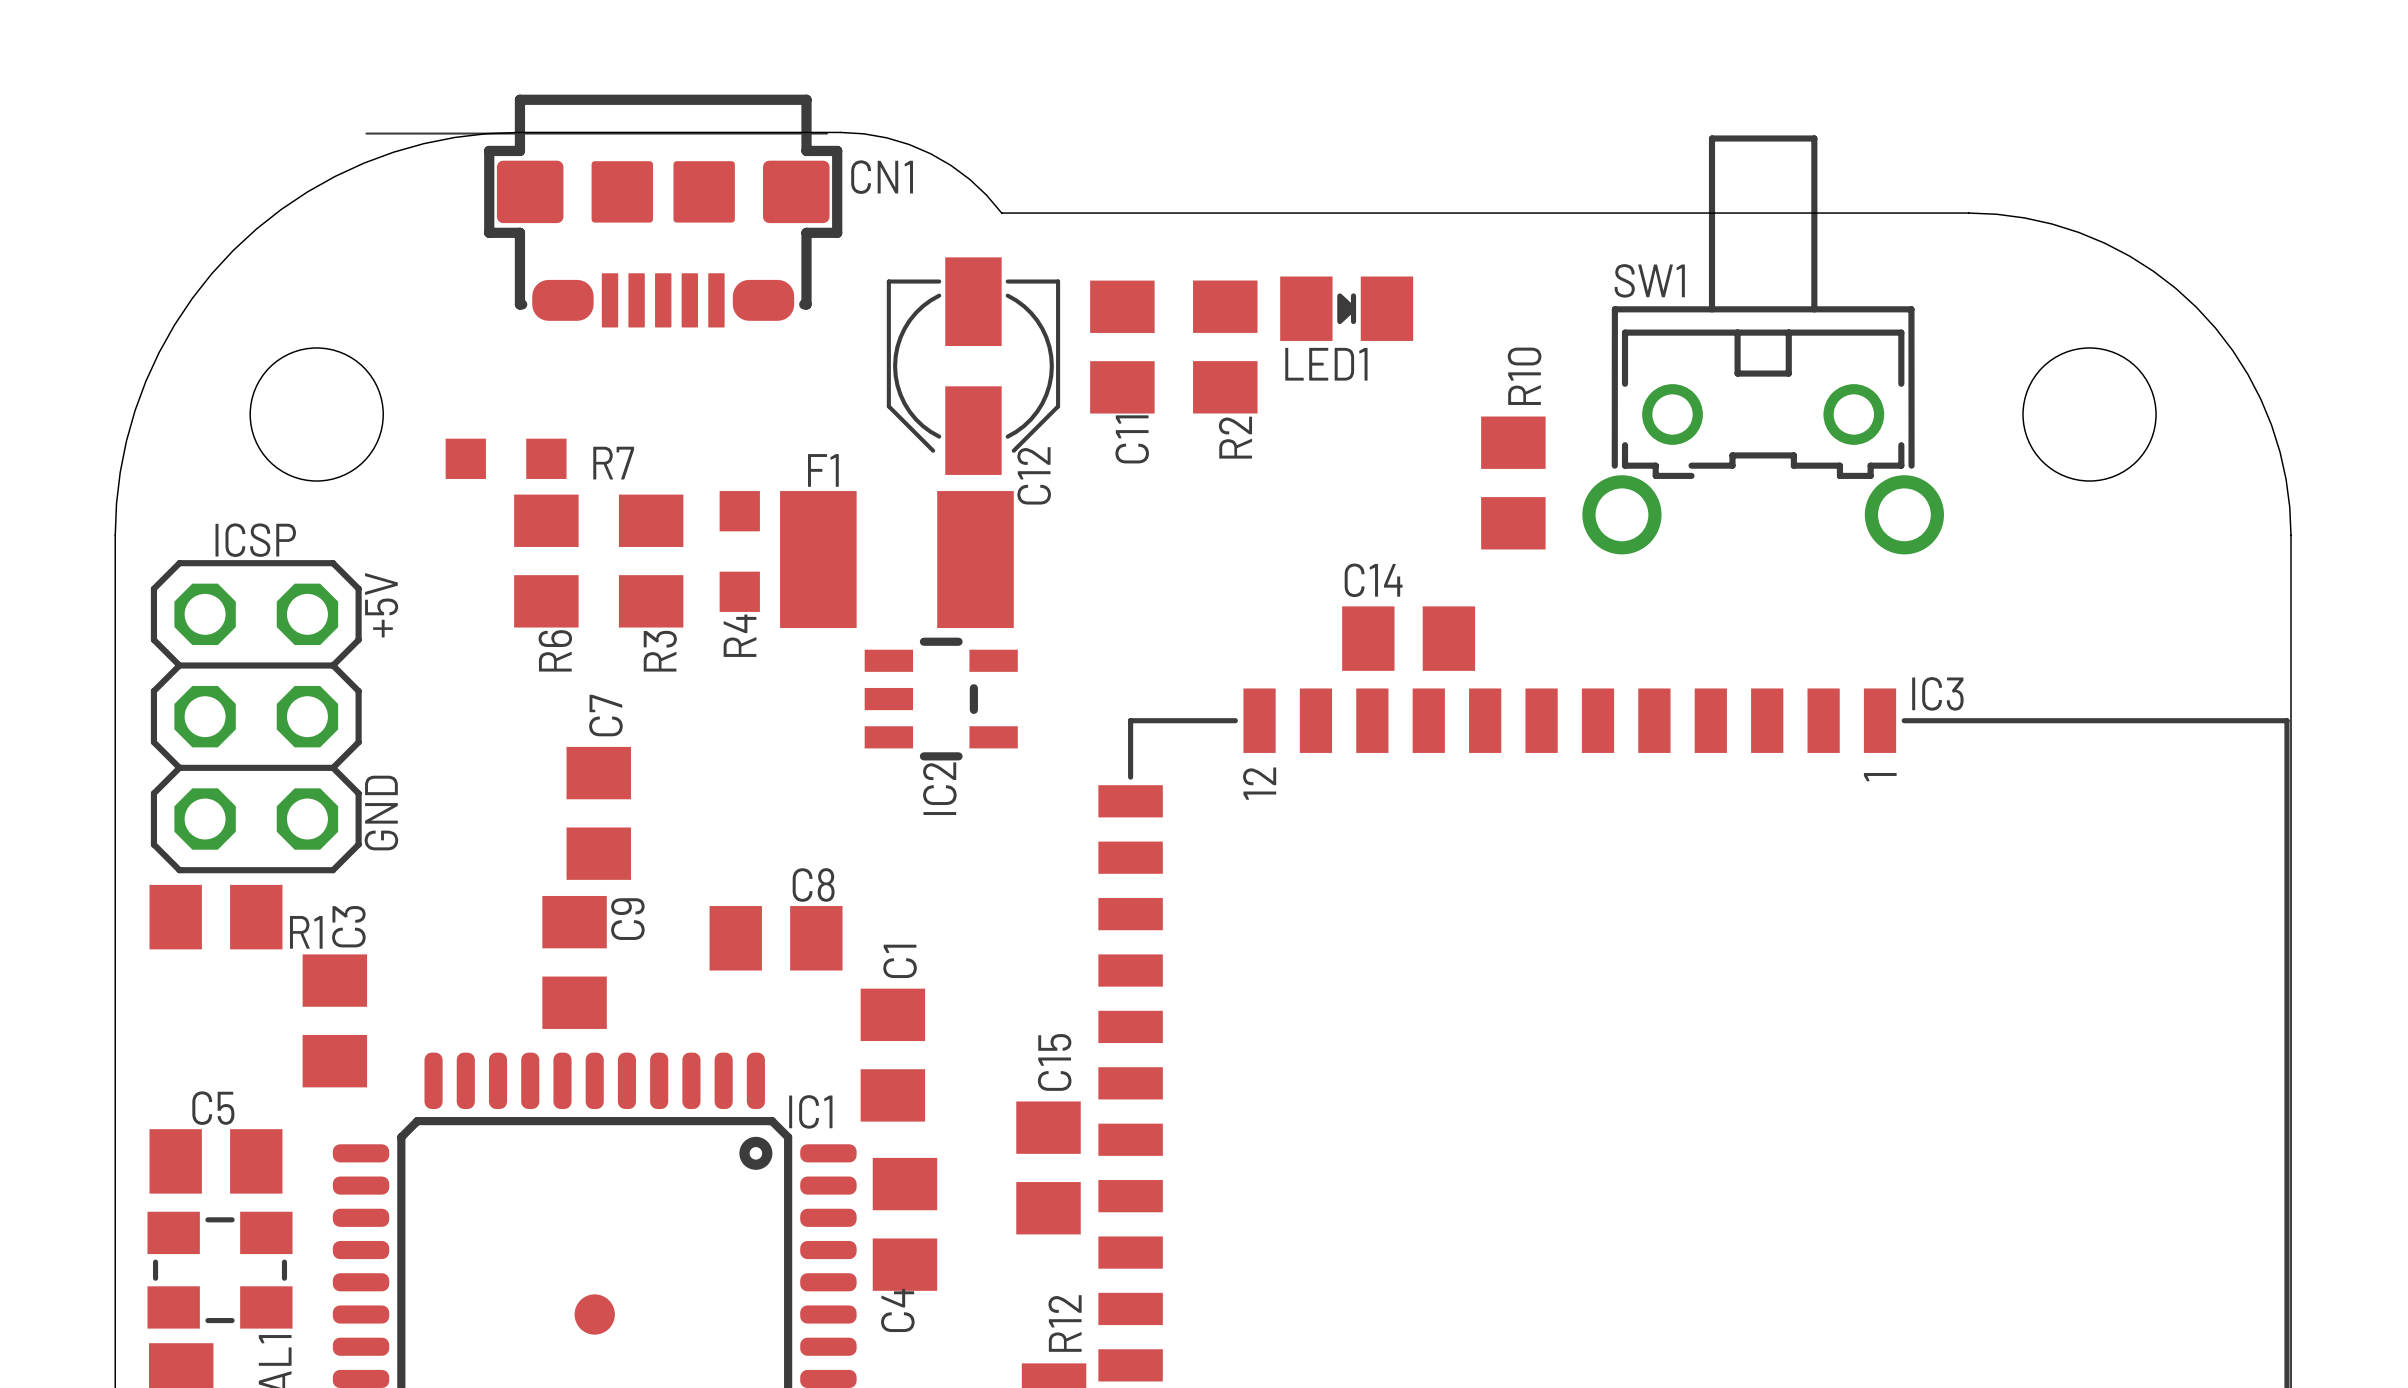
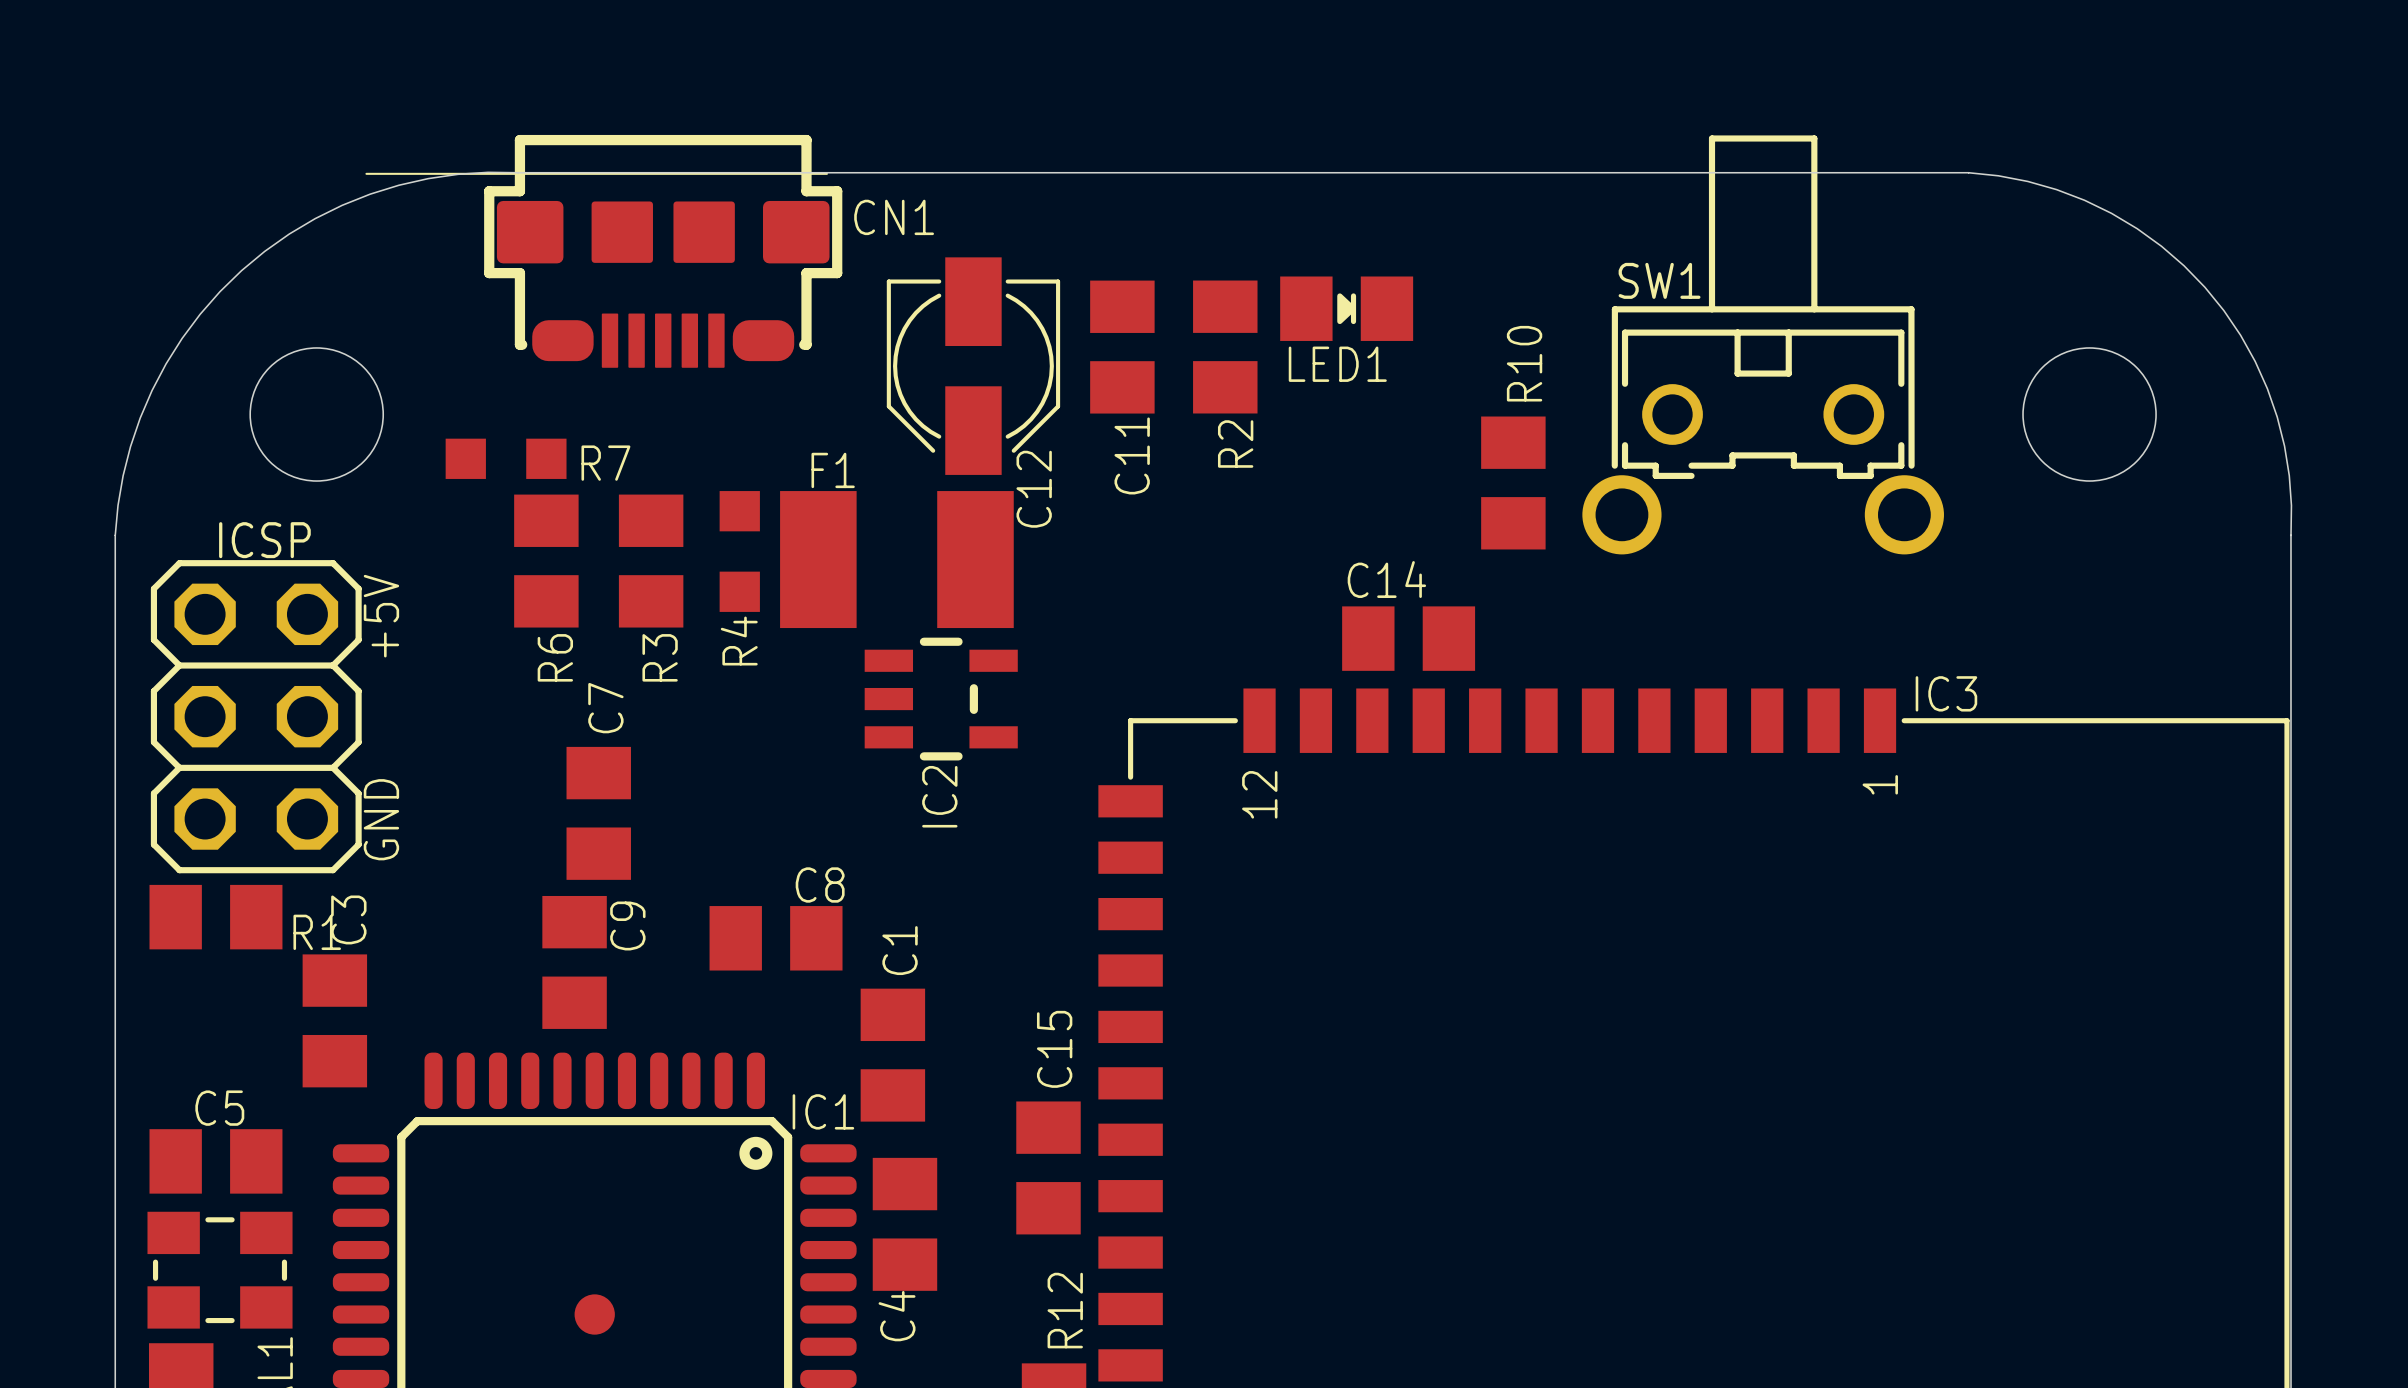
CN1 position: (603, 211) -> (603, 251)
board edge: (115, 535) (116, 503) (126, 441) (145, 381) (159, 352) (192, 298) (233, 250) (281, 209) (335, 176) (363, 163) (424, 143) (486, 133) (518, 132) (863, 133) (909, 144) (950, 165) (986, 195) (1001, 213) (1968, 213) (2024, 217) (2052, 224) (2104, 243) (2129, 256) (2175, 288) (2215, 328) (2247, 374) (2271, 425) (2286, 479) (2290, 535) -> (115, 535) (118, 505) (130, 446) (152, 390) (166, 363) (200, 314) (241, 270) (289, 234) (342, 205) (370, 194) (428, 178) (488, 172) (1968, 172) (2027, 181) (2084, 200) (2137, 228) (2184, 265) (2223, 310) (2255, 361) (2277, 417) (2289, 475) (2290, 535)

